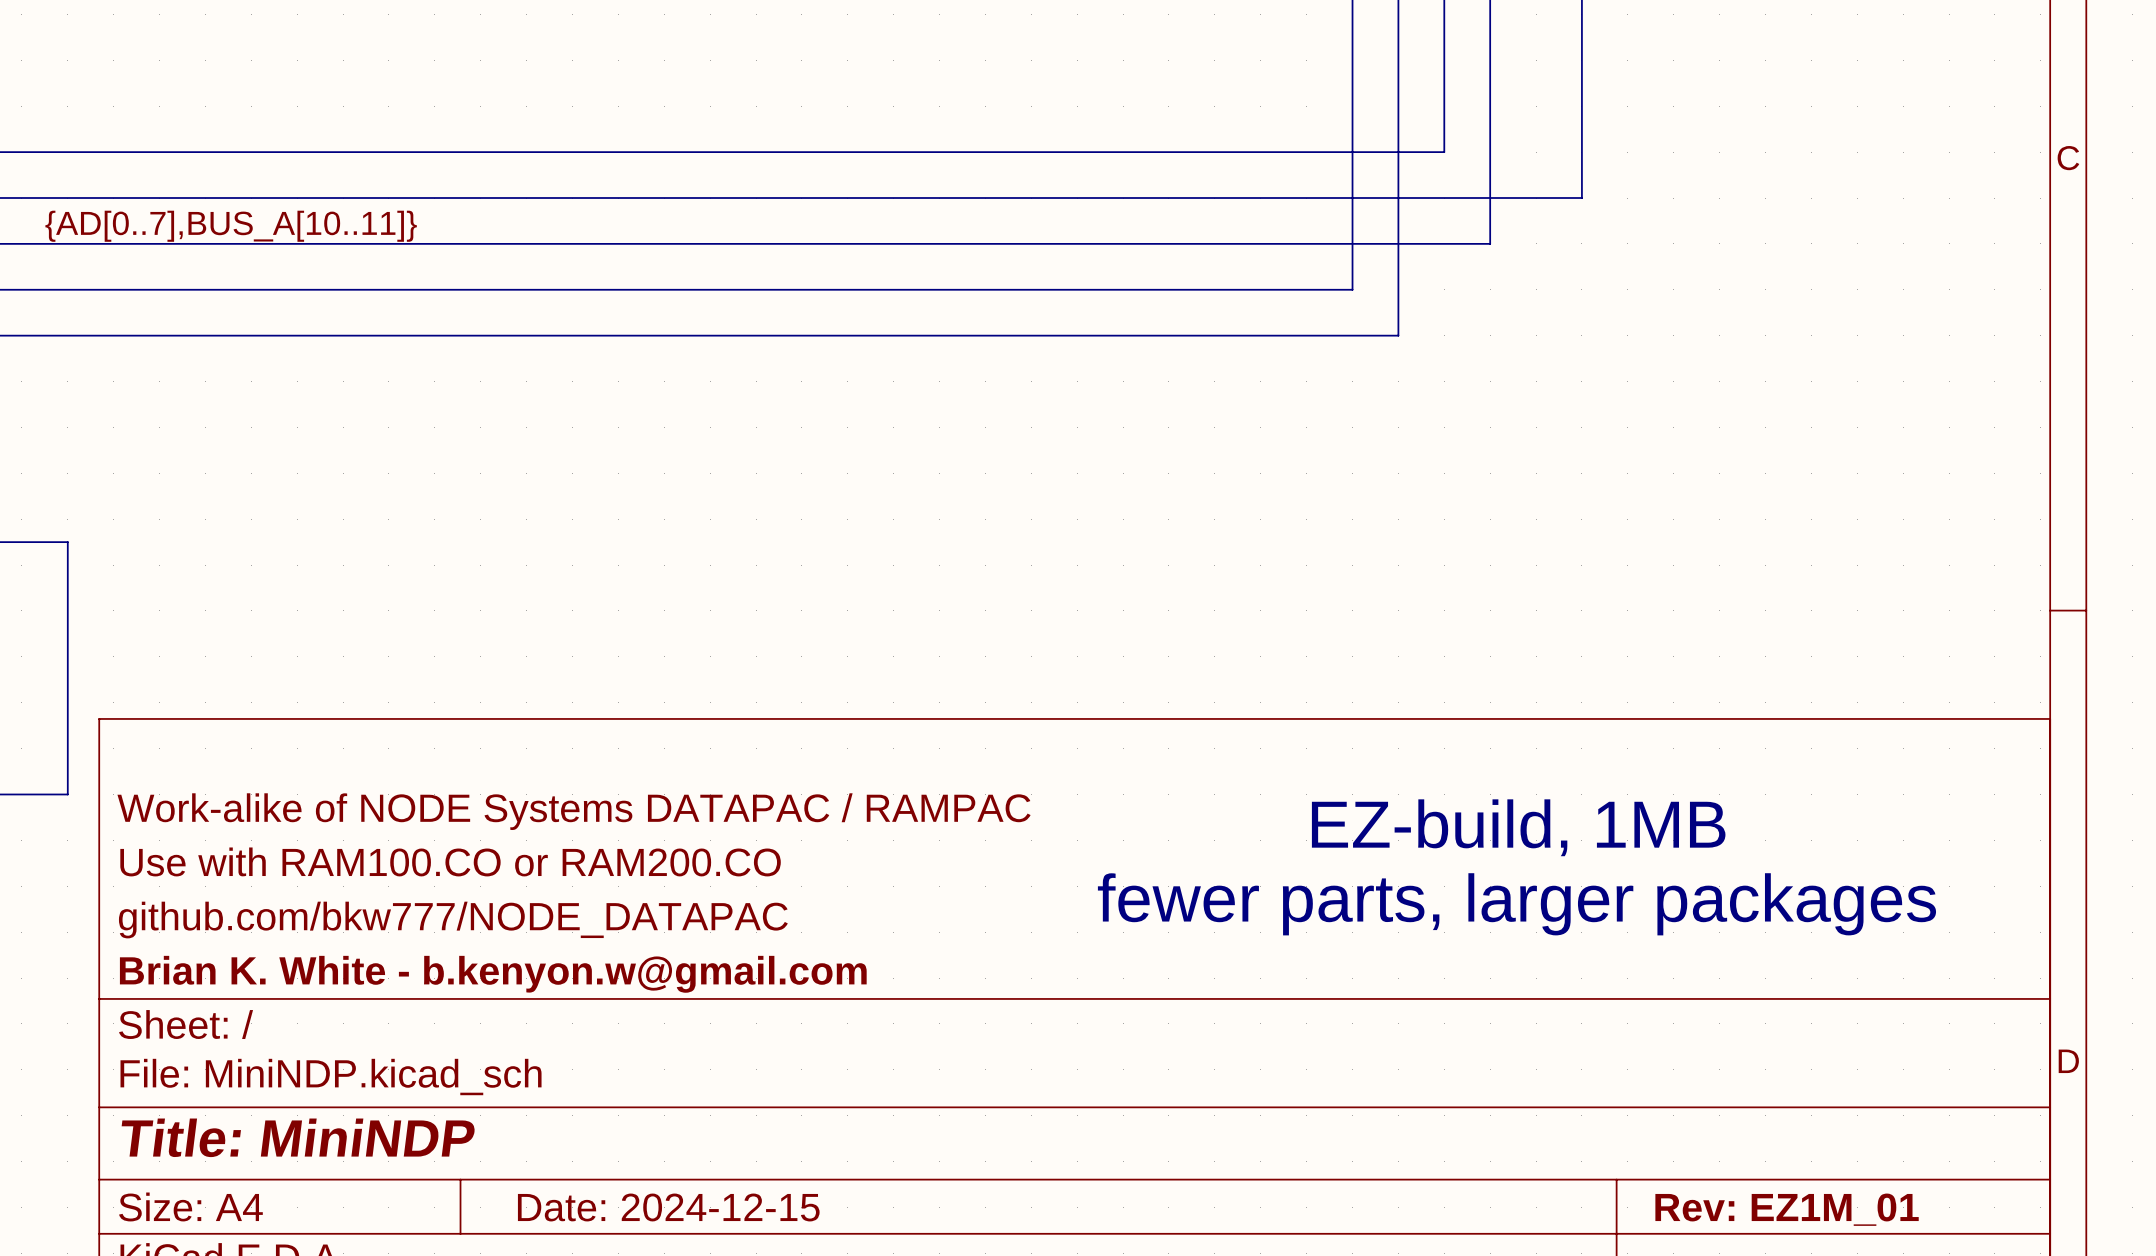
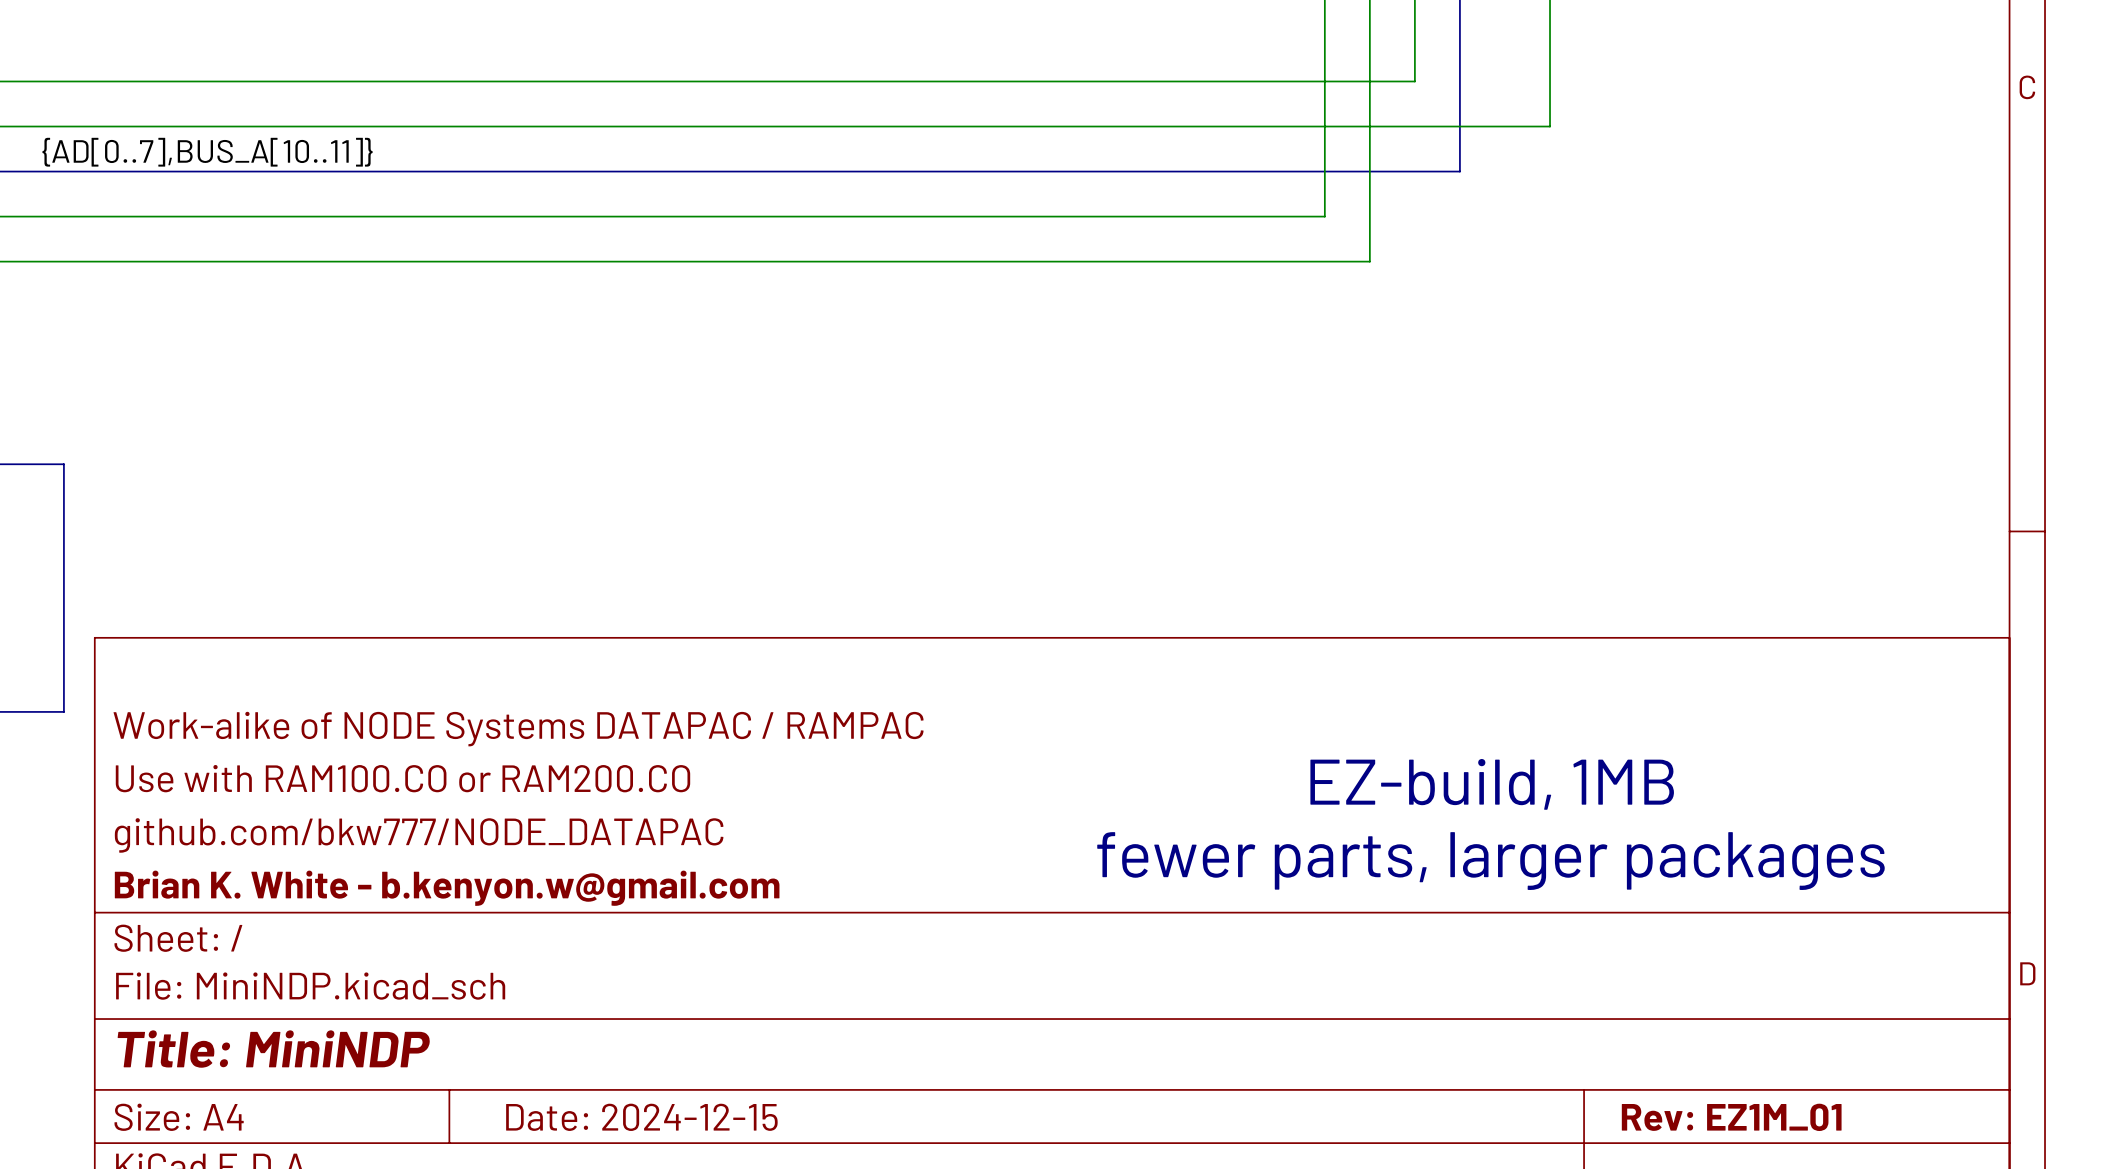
text position: EZ-build, 1MB (1518, 827) -> EZ-build, 1MB (1492, 784)
text position: fewer parts, larger packages (1516, 904) -> fewer parts, larger packages (1490, 861)

